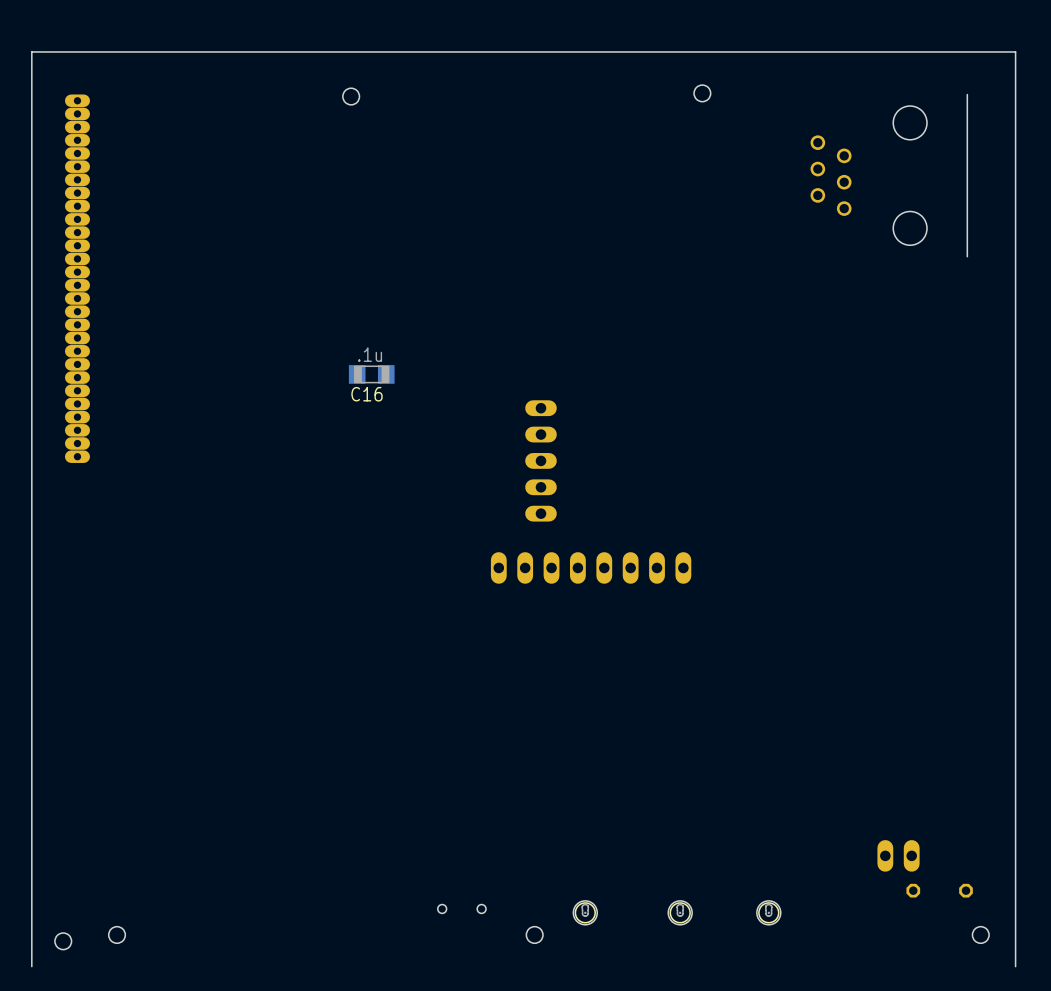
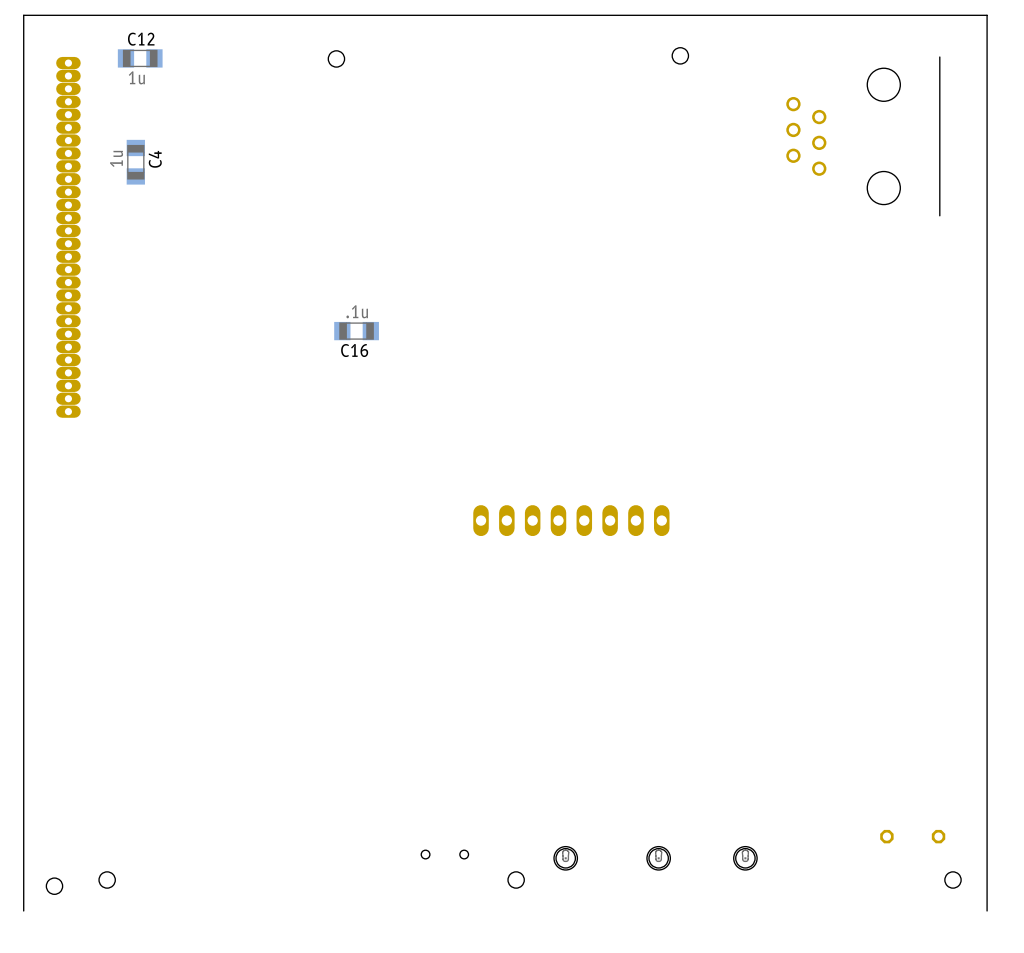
C12: none -> 1u (140, 58)
C4: none -> 1u (135, 162)
part: (541, 460) -> none
part: (898, 855) -> none

